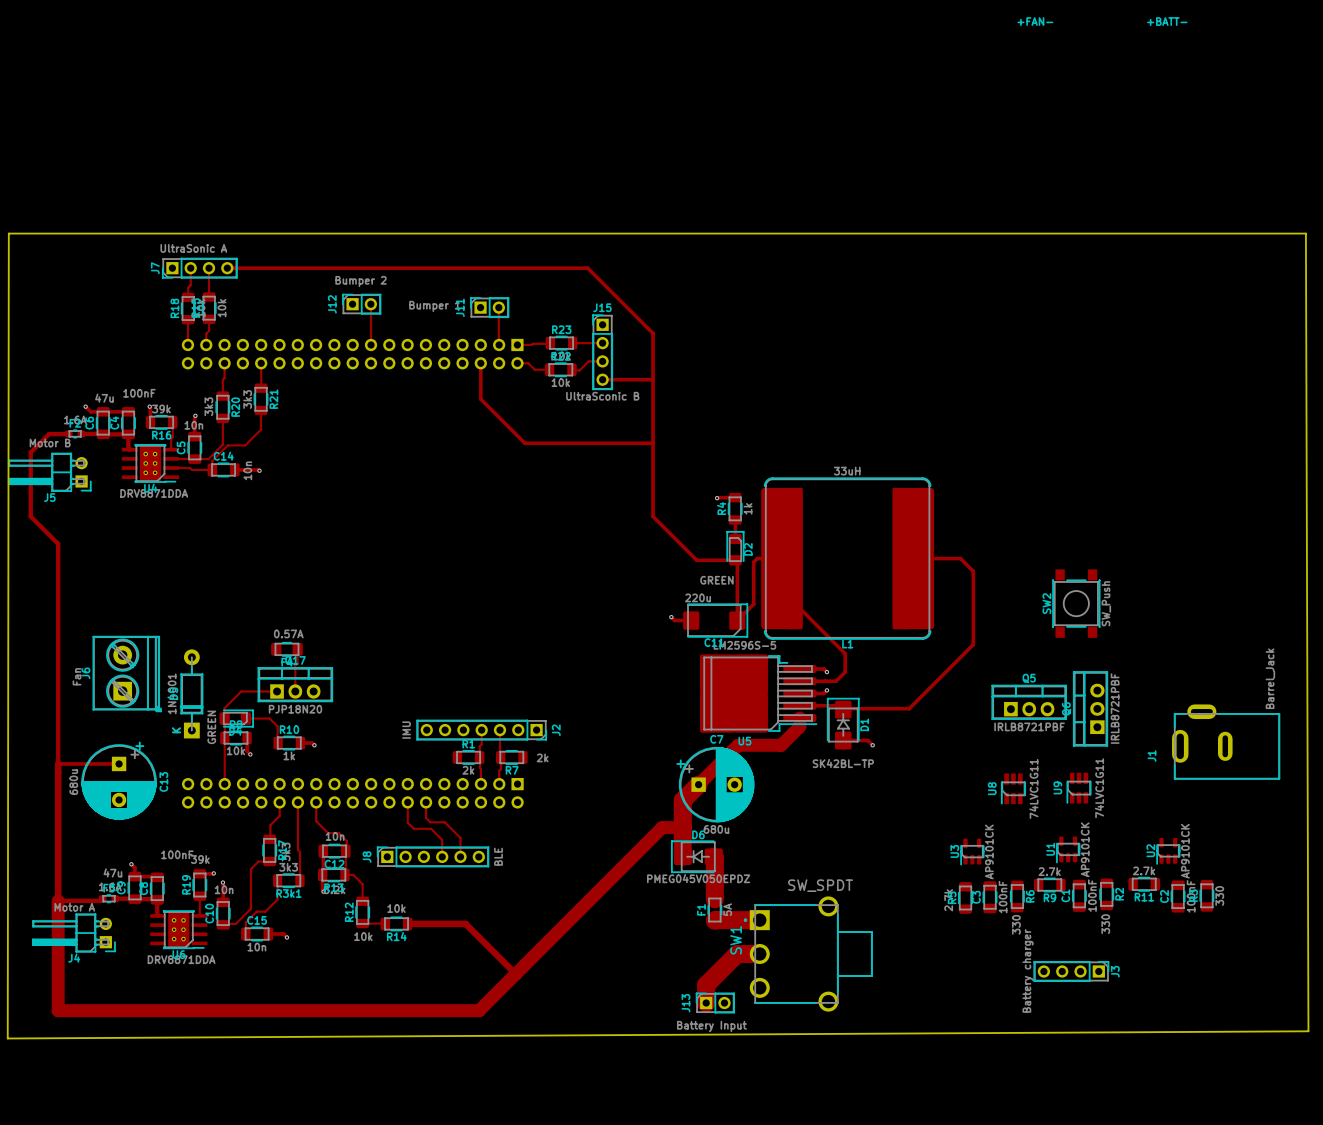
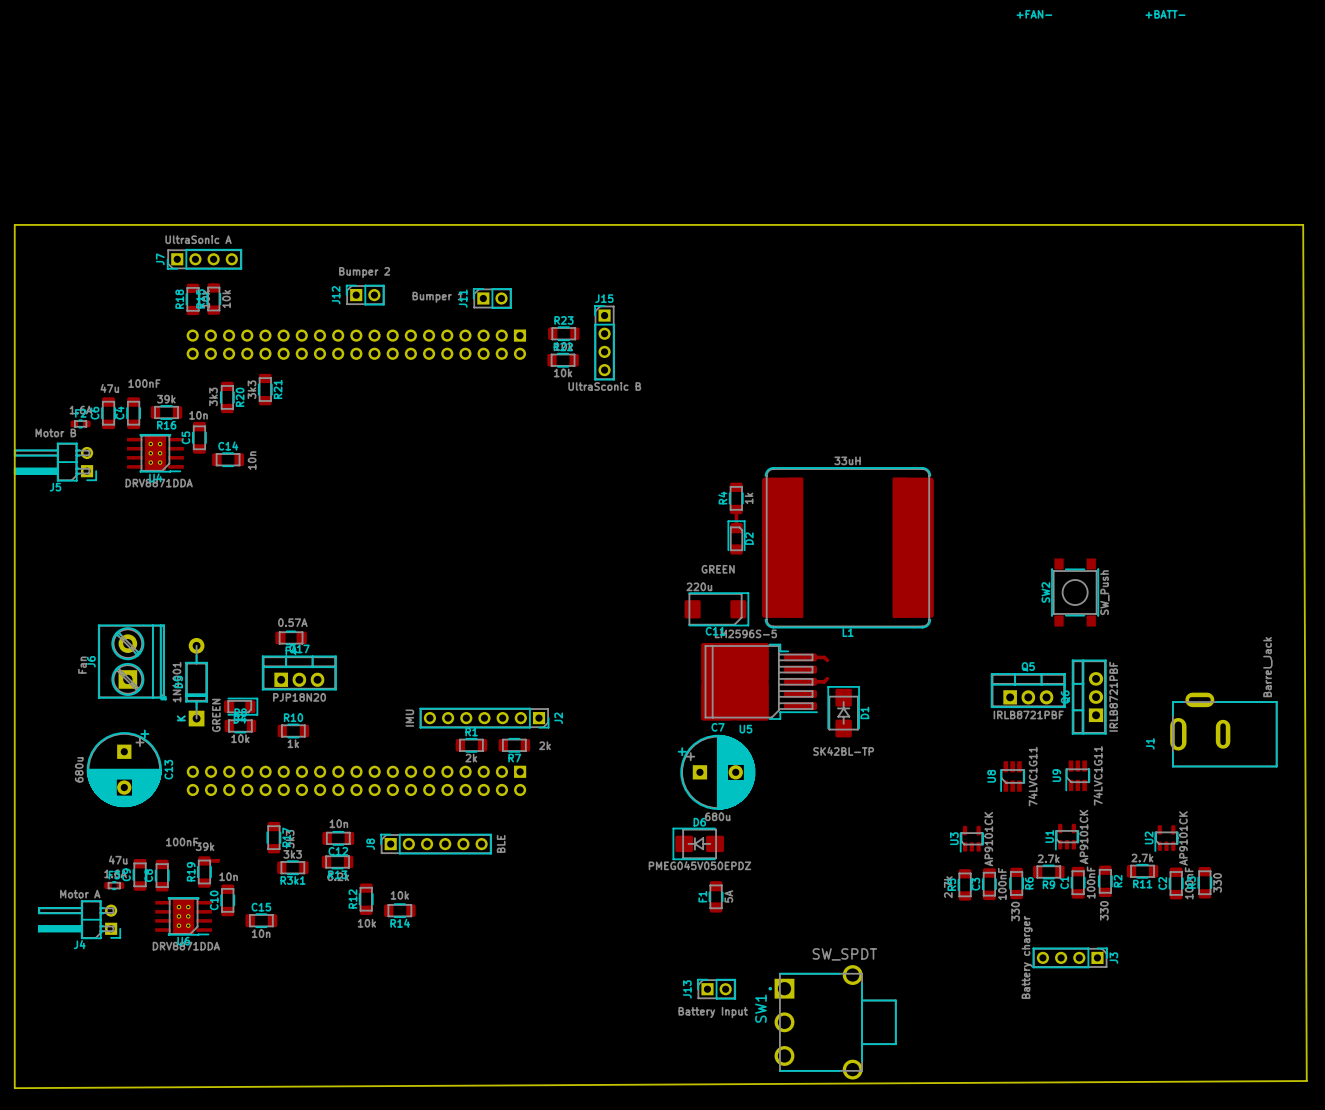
board edge: (8, 233) (7, 1038) (1308, 1031) (1305, 233) -> (14, 224) (14, 1088) (1306, 1081) (1303, 224)
track: (190, 268) (188, 297) -> none
track: (209, 268) (209, 296) -> none
track: (227, 268) (587, 268) (653, 333) (653, 516) (696, 560) (735, 560) (737, 562) (737, 620) (753, 604) (753, 562) (757, 558) (781, 558) (781, 590) (845, 653) (845, 672) (836, 681) (799, 681) -> none
track: (370, 304) (371, 344) -> none
track: (498, 307) (499, 344) -> none
track: (188, 319) (187, 344) -> none
track: (209, 319) (206, 344) -> none
track: (550, 343) (517, 344) -> none
track: (572, 343) (602, 343) -> none
track: (602, 361) (588, 361) (579, 370) (571, 369) -> none
track: (224, 363) (222, 396) -> none
track: (261, 363) (261, 388) -> none
track: (480, 363) (480, 399) (524, 443) (653, 443) -> none
track: (517, 363) (528, 363) (534, 369) (549, 369) -> none
track: (653, 379) (602, 379) -> none
track: (85, 406) (90, 411) (128, 411) -> none
via: (85, 406) -> none
track: (149, 406) (150, 422) -> none
via: (149, 406) -> none
track: (261, 410) (261, 429) (245, 445) (227, 445) (212, 461) (212, 469) (171, 468) -> none
track: (195, 415) (194, 436) -> none
via: (195, 415) -> none
track: (222, 418) (222, 444) (208, 459) (171, 458) -> none
track: (172, 422) (171, 449) -> none
track: (68, 433) (49, 434) (30, 452) (30, 516) (58, 543) (58, 763) -> none
track: (81, 433) (128, 434) (129, 449) -> none
track: (234, 469) (259, 470) -> none
via: (259, 470) -> none
track: (735, 497) (717, 498) -> none
via: (717, 498) -> none
track: (913, 558) (960, 558) (973, 571) (973, 644) (909, 708) (843, 709) (839, 705) (799, 705) -> none
track: (671, 617) (674, 620) (691, 620) -> none
via: (671, 617) -> none
track: (297, 649) (297, 662) -> none
track: (297, 663) (295, 665) (295, 691) -> none
via: (826, 672) -> none
via: (826, 690) -> none
track: (277, 691) (241, 691) (224, 708) (224, 738) -> none
track: (246, 718) (269, 718) (277, 726) (278, 743) -> none
track: (799, 718) (799, 726) (781, 745) (738, 745) (682, 800) (682, 856) -> none
track: (481, 730) (481, 744) (479, 746) (480, 784) -> none
track: (499, 730) (501, 768) (499, 770) (499, 784) -> none
track: (224, 738) (224, 784) -> none
track: (247, 738) (247, 751) (250, 754) -> none
track: (843, 740) (867, 740) (872, 745) -> none
track: (300, 743) (312, 743) (314, 745) -> none
via: (314, 745) -> none
via: (872, 745) -> none
via: (250, 754) -> none
track: (58, 763) (119, 763) -> none
track: (58, 763) (58, 900) -> none
track: (279, 802) (279, 815) (270, 825) (269, 839) -> none
track: (297, 802) (299, 880) -> none
track: (316, 802) (316, 821) (328, 833) (338, 833) (346, 841) (344, 874) (353, 874) (362, 884) (362, 901) -> none
track: (407, 802) (407, 822) (413, 828) (431, 828) (442, 839) (442, 856) -> none
track: (426, 802) (426, 817) (430, 822) (444, 822) (460, 838) (460, 856) -> none
track: (682, 827) (662, 827) (479, 1010) (58, 1010) (58, 900) -> none
track: (323, 851) (323, 891) -> none
track: (713, 856) (714, 899) -> none
track: (269, 861) (258, 861) (250, 869) (250, 908) (235, 923) (223, 924) -> none
track: (131, 864) (134, 867) (134, 876) (157, 877) -> none
via: (131, 864) -> none
via: (213, 873) -> none
track: (277, 880) (277, 899) (265, 911) (256, 911) (245, 922) (245, 933) -> none
track: (222, 882) (223, 902) -> none
via: (222, 882) -> none
via: (323, 891) -> none
track: (199, 896) (199, 915) -> none
track: (102, 898) (100, 900) (58, 900) -> none
track: (115, 898) (156, 899) (158, 915) -> none
track: (759, 920) (714, 920) -> none
track: (362, 923) (385, 923) -> none
track: (407, 923) (465, 923) (515, 974) -> none
track: (268, 934) (283, 934) (286, 937) -> none
via: (286, 937) -> none
track: (759, 954) (737, 954) (706, 984) (706, 1003) -> none
SW1 position: (808, 954) -> (832, 1022)

